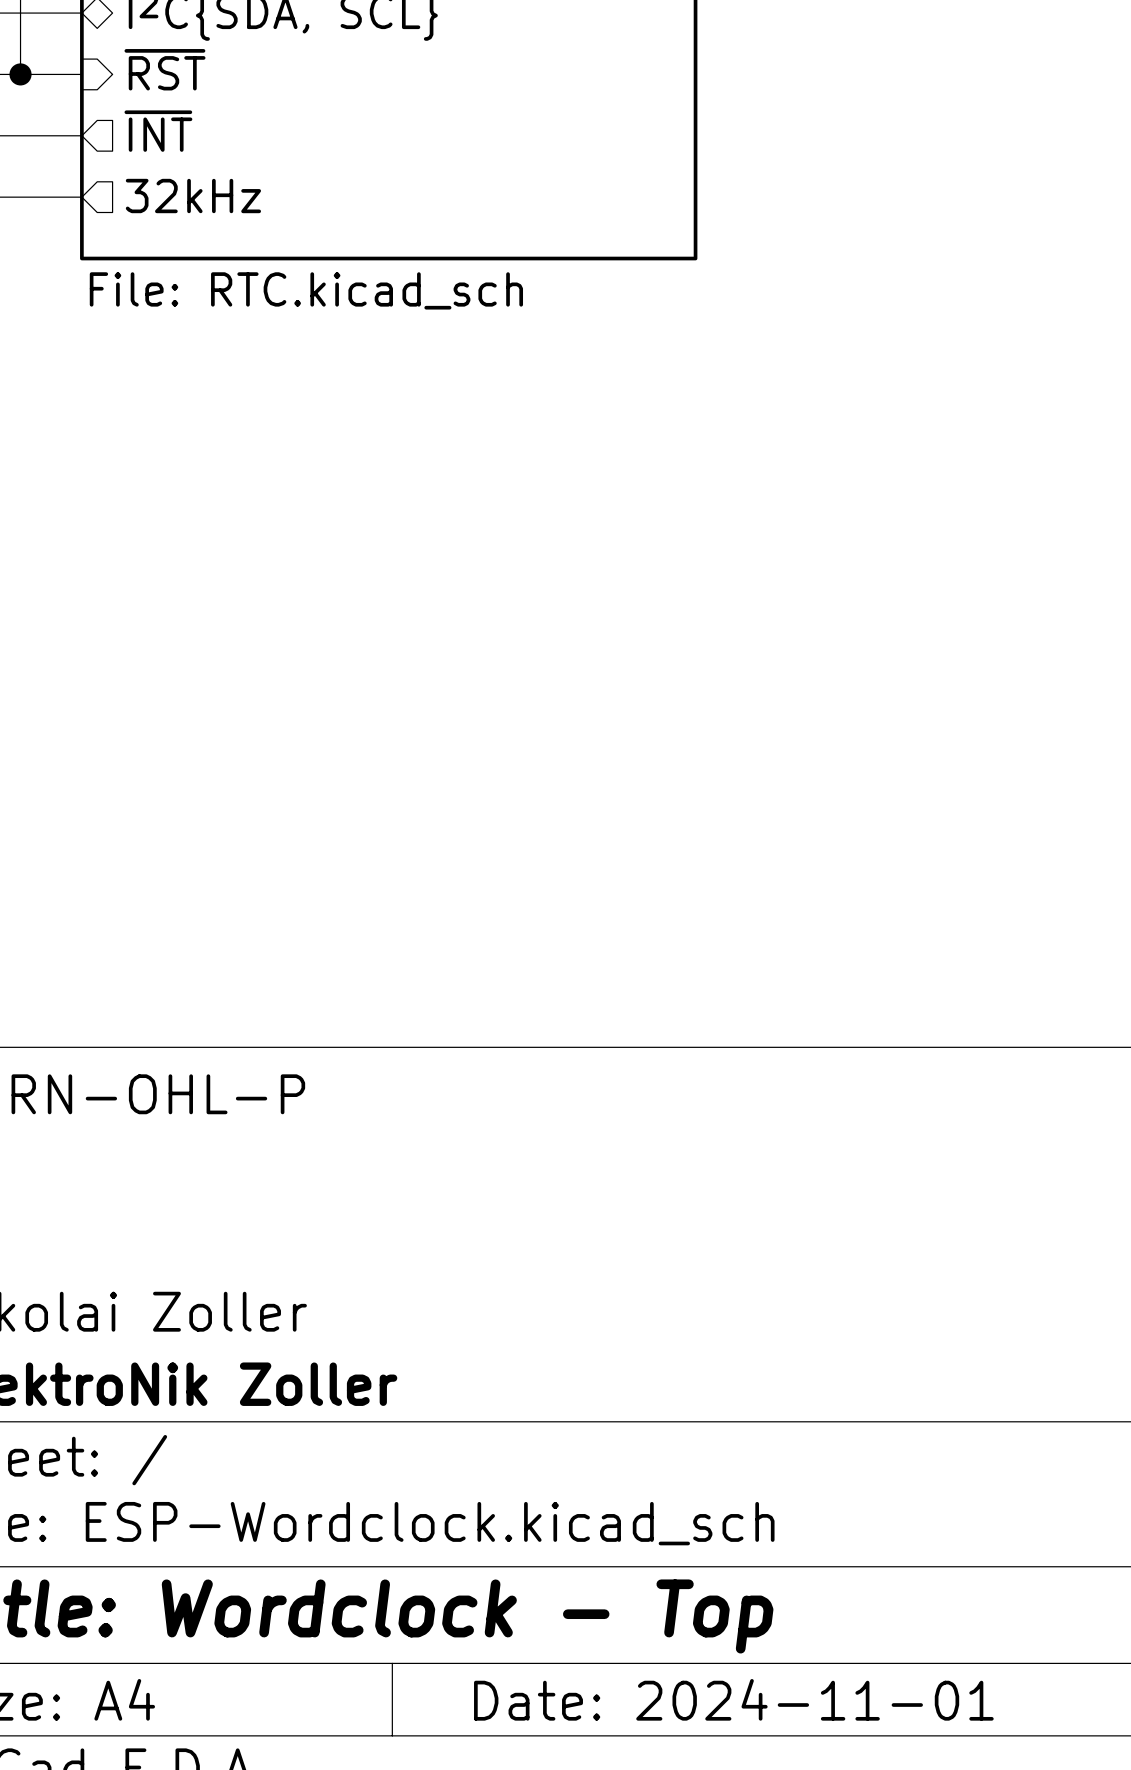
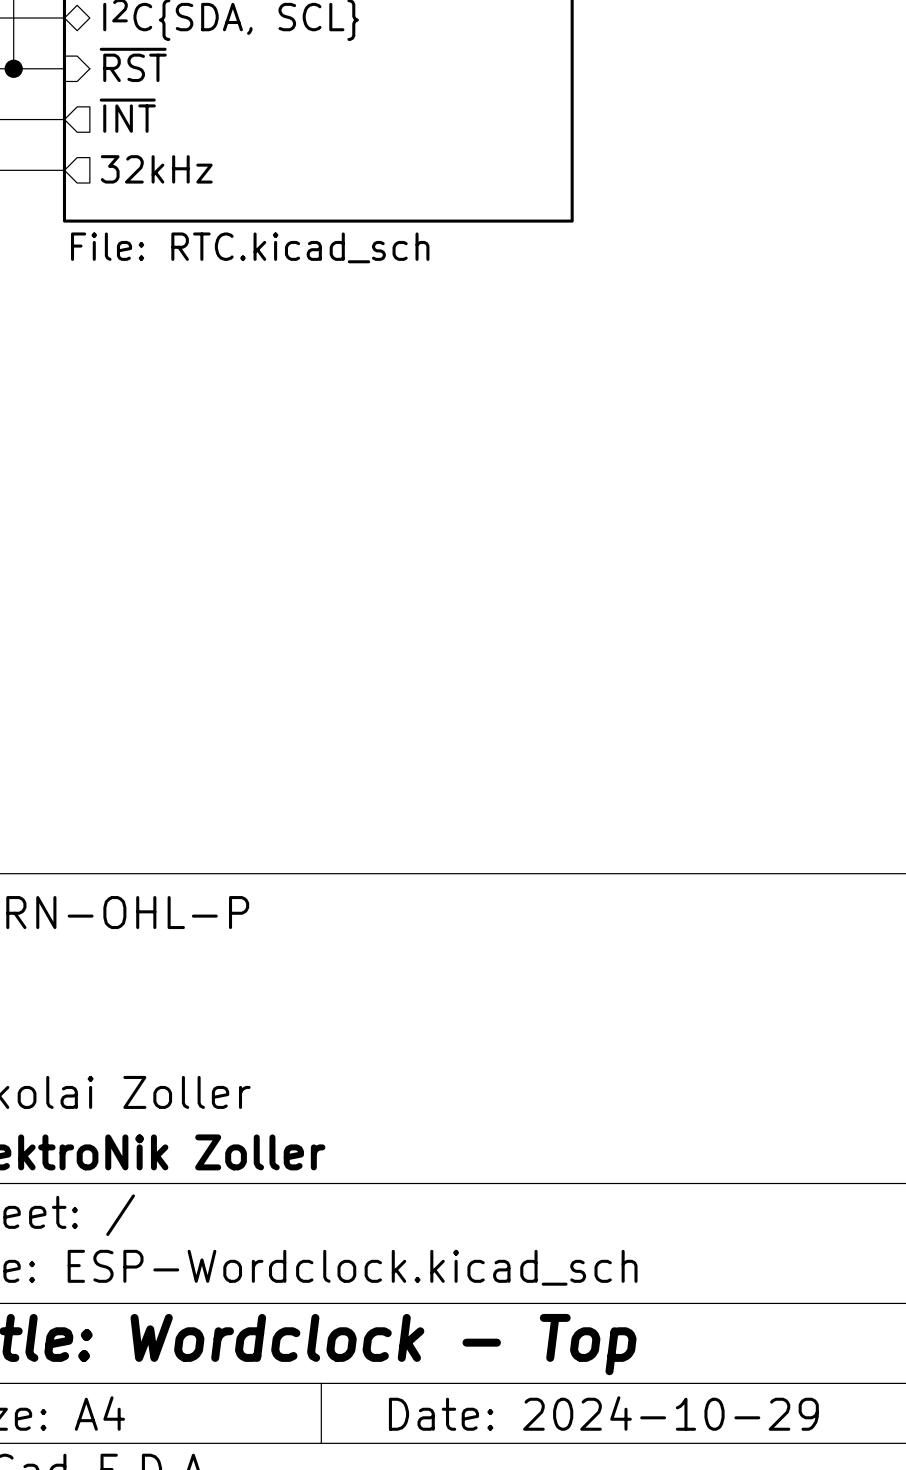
title block: Date: 2024-11-01 (733, 1699) -> Date: 2024-10-29 (603, 1413)

